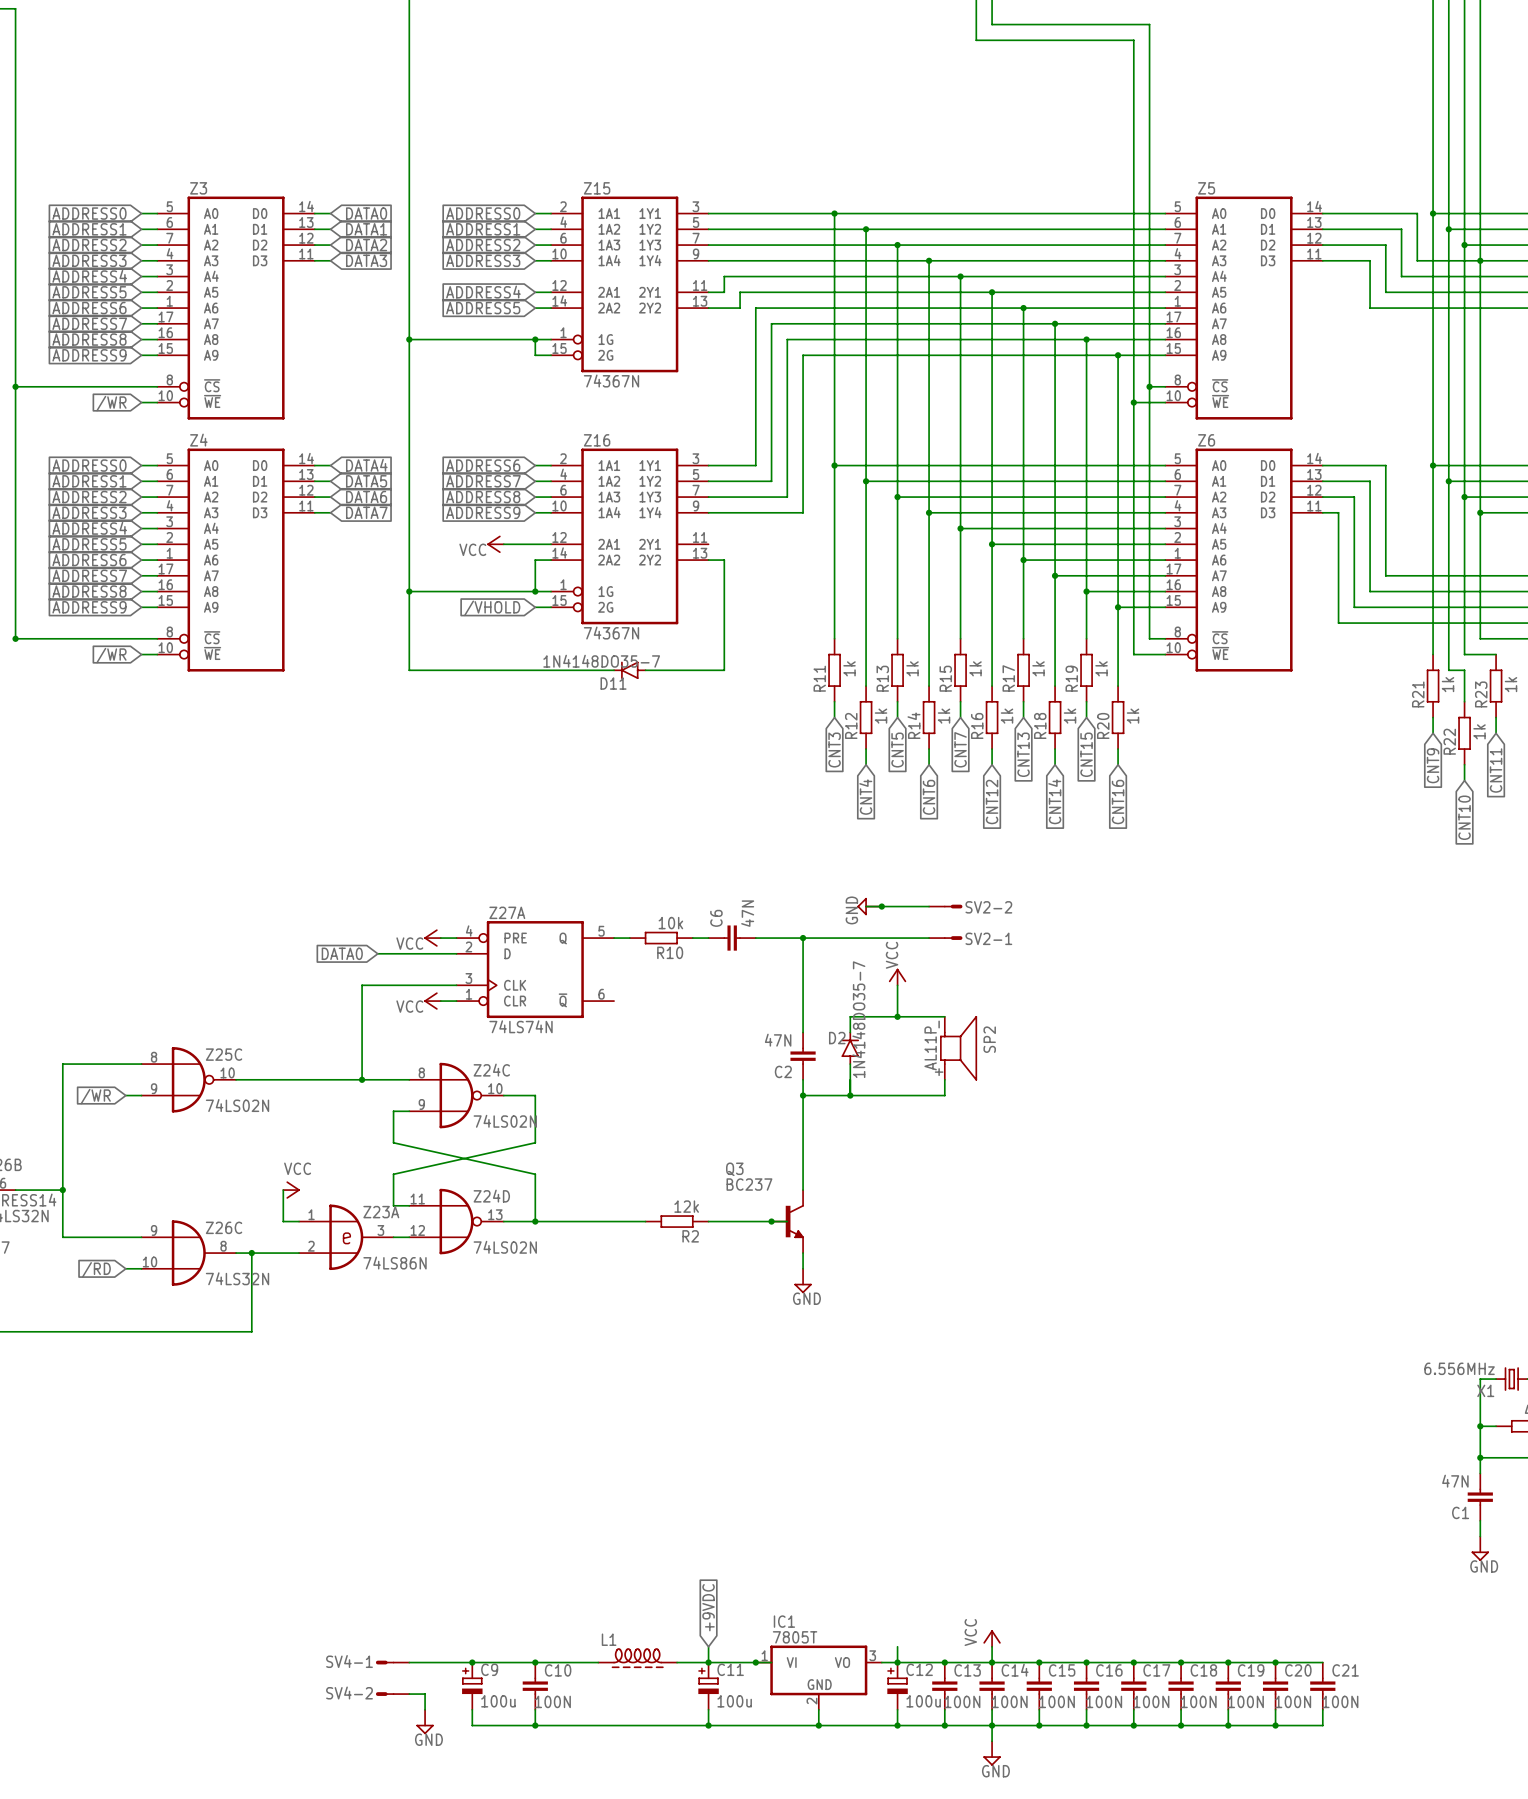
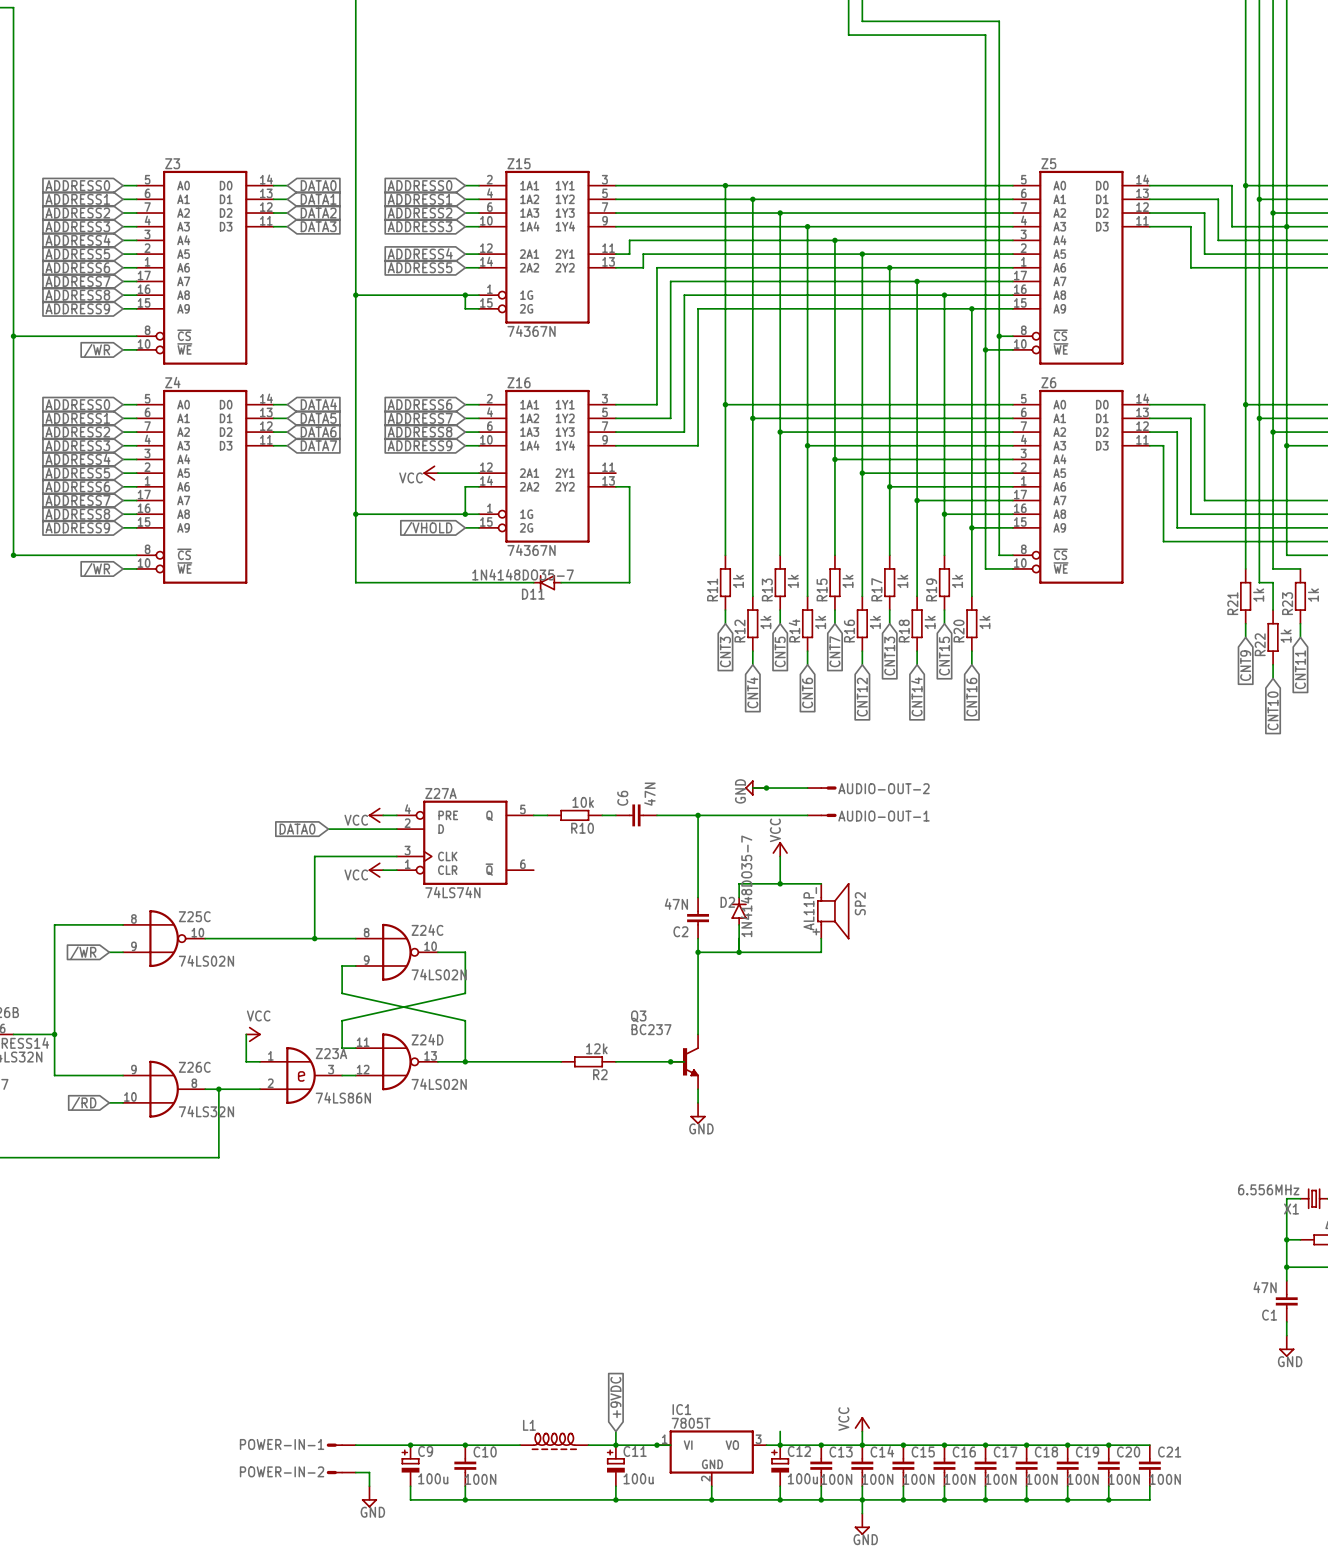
SV2-2 name: SV2-2 (988, 907) -> AUDIO-OUT-2 (884, 788)
SV2-1 name: SV2-1 (988, 938) -> AUDIO-OUT-1 (884, 816)
SV4-1 name: SV4-1 (349, 1661) -> POWER-IN-1 (282, 1444)
SV4-2 name: SV4-2 (349, 1693) -> POWER-IN-2 (282, 1471)

